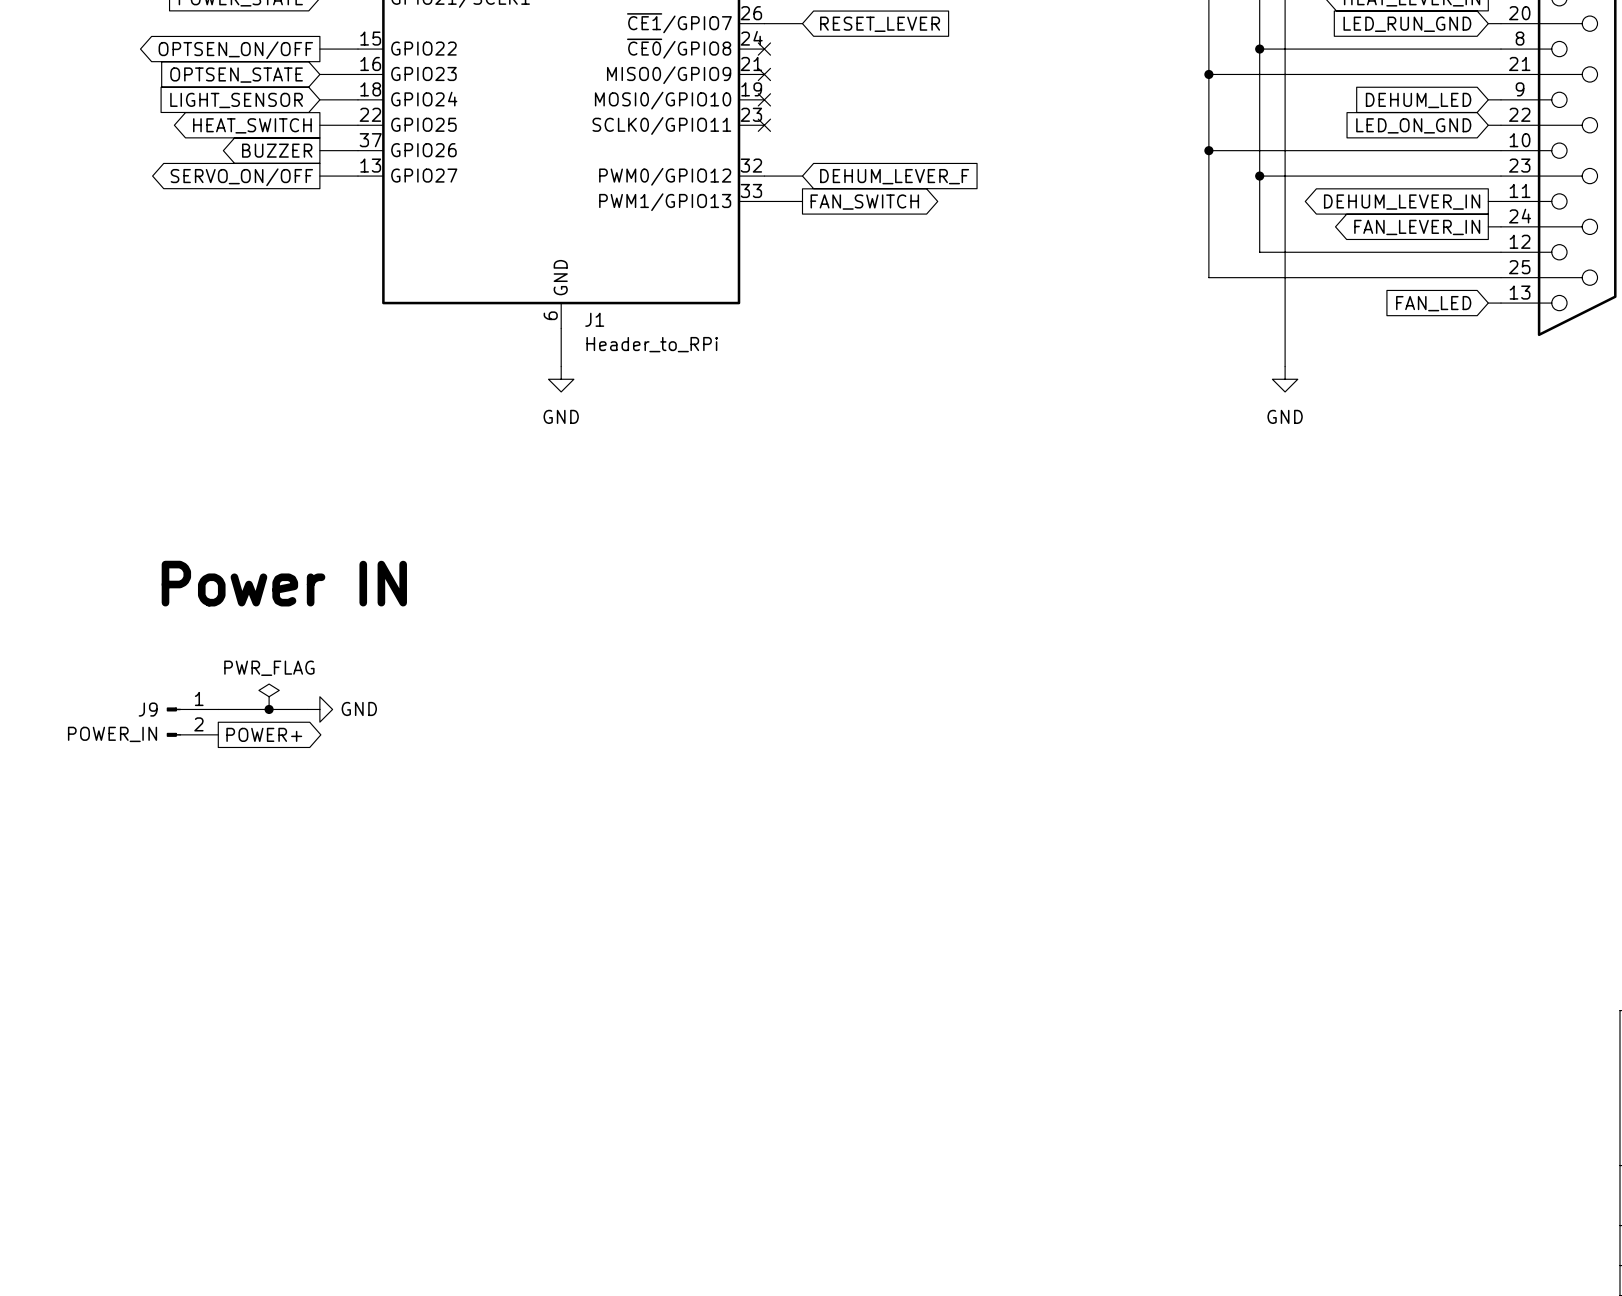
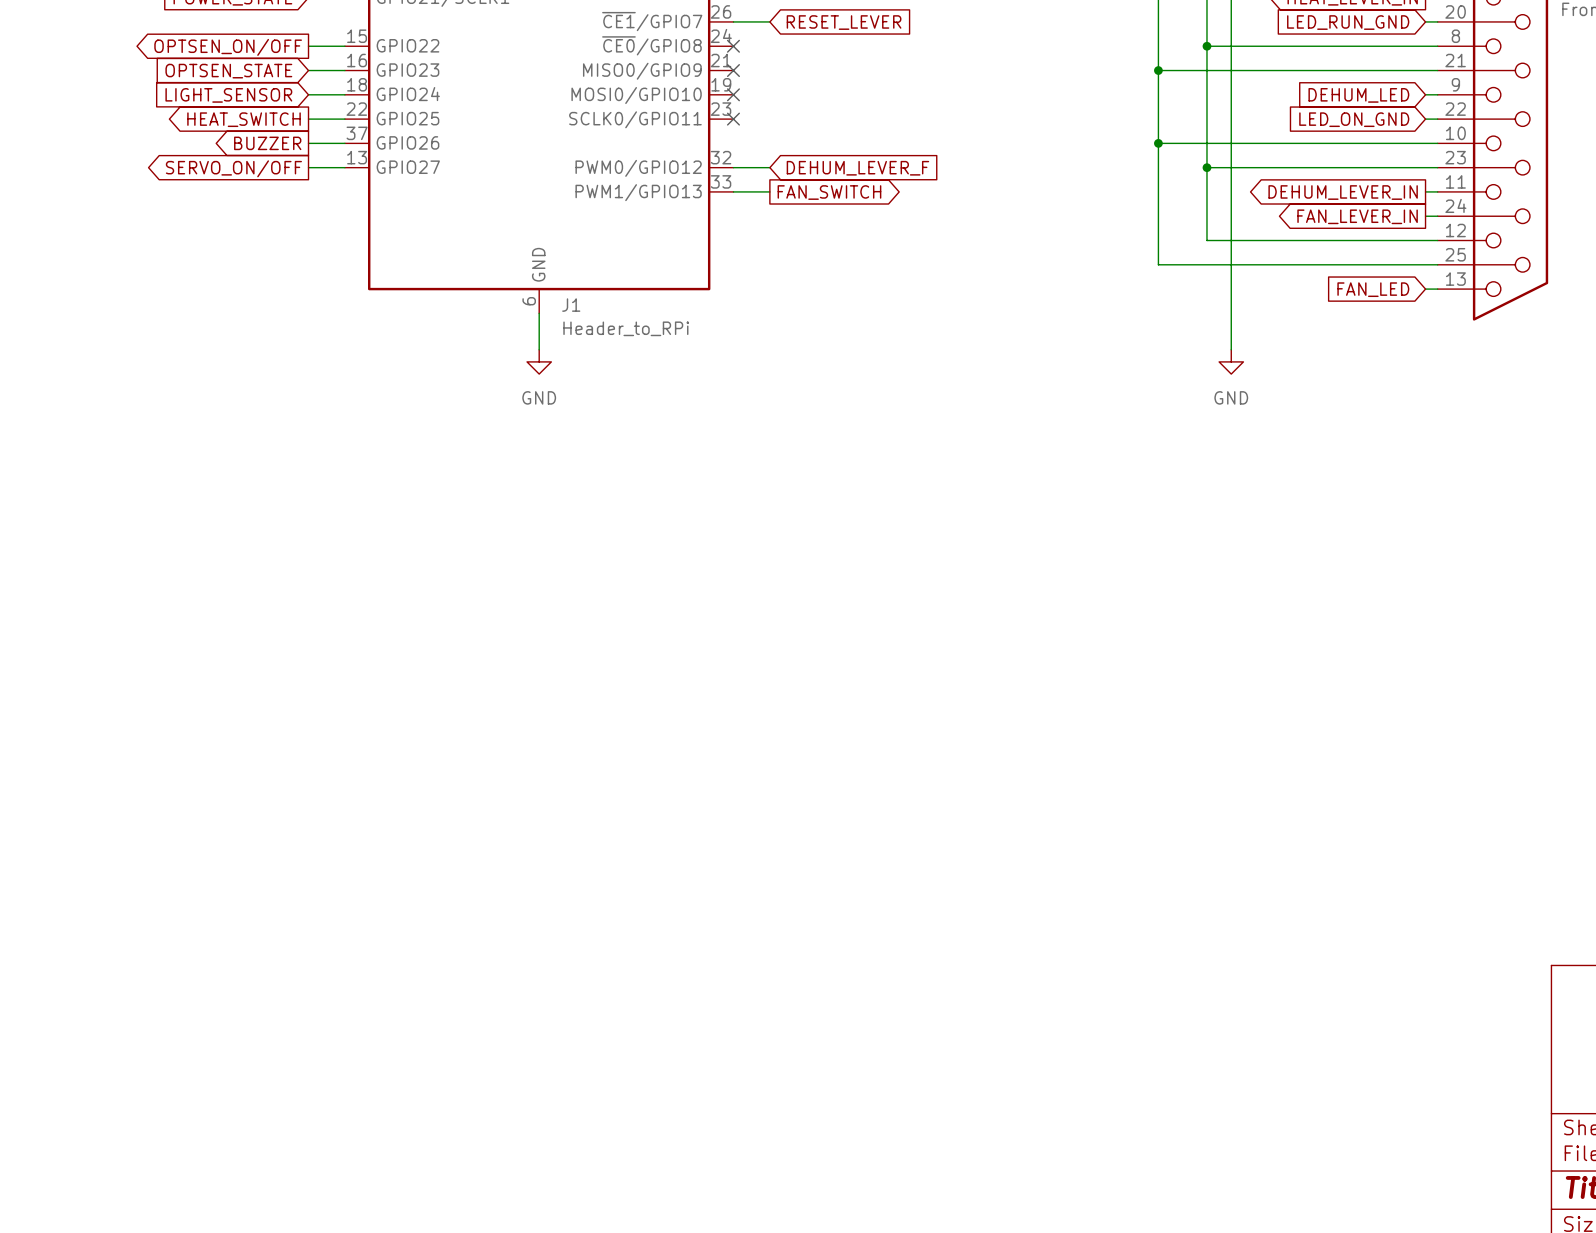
text: Power IN (284, 583) -> none
power symbol: PWR_FLAG (269, 696) -> none
wire: (218, 709) (307, 709) -> none
junction: (269, 709) -> none
power symbol: GND (319, 709) -> none
J9: POWER_IN (192, 722) -> none
global label: POWER+ (264, 734) -> none

